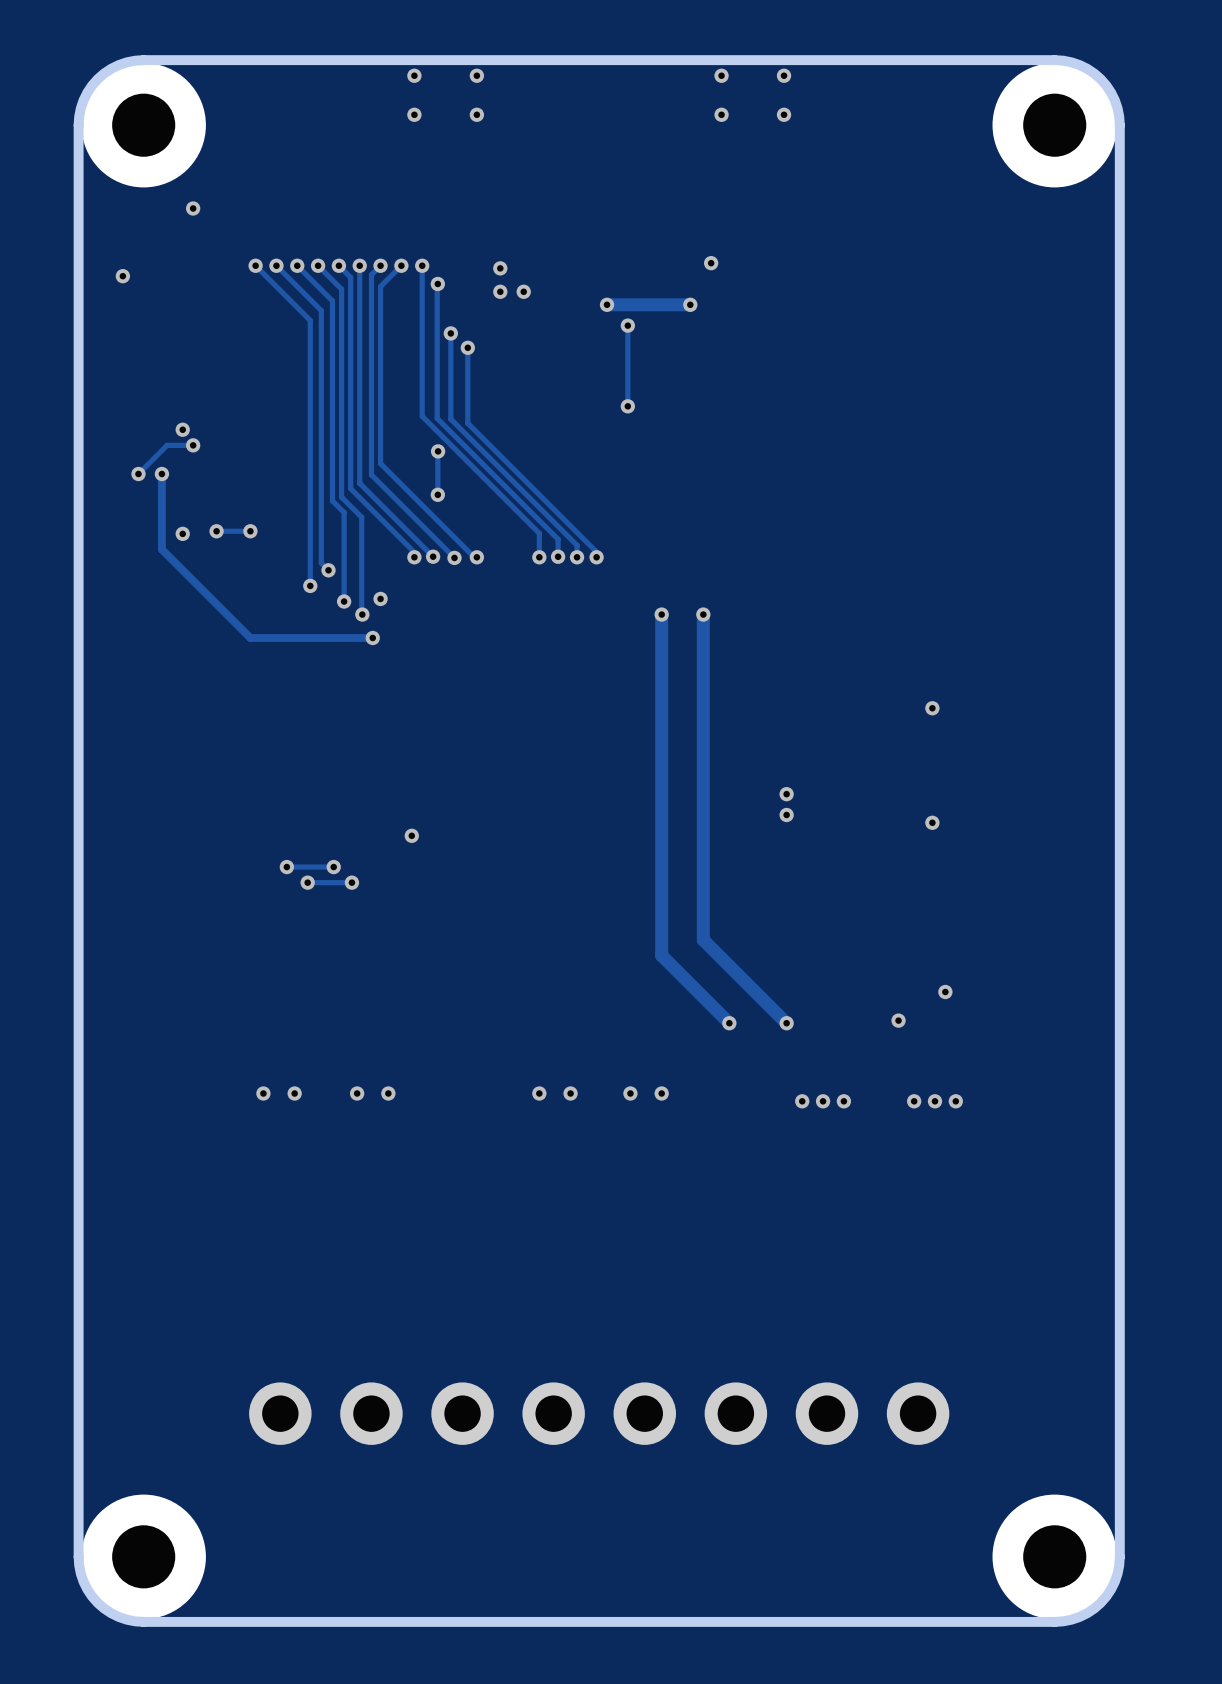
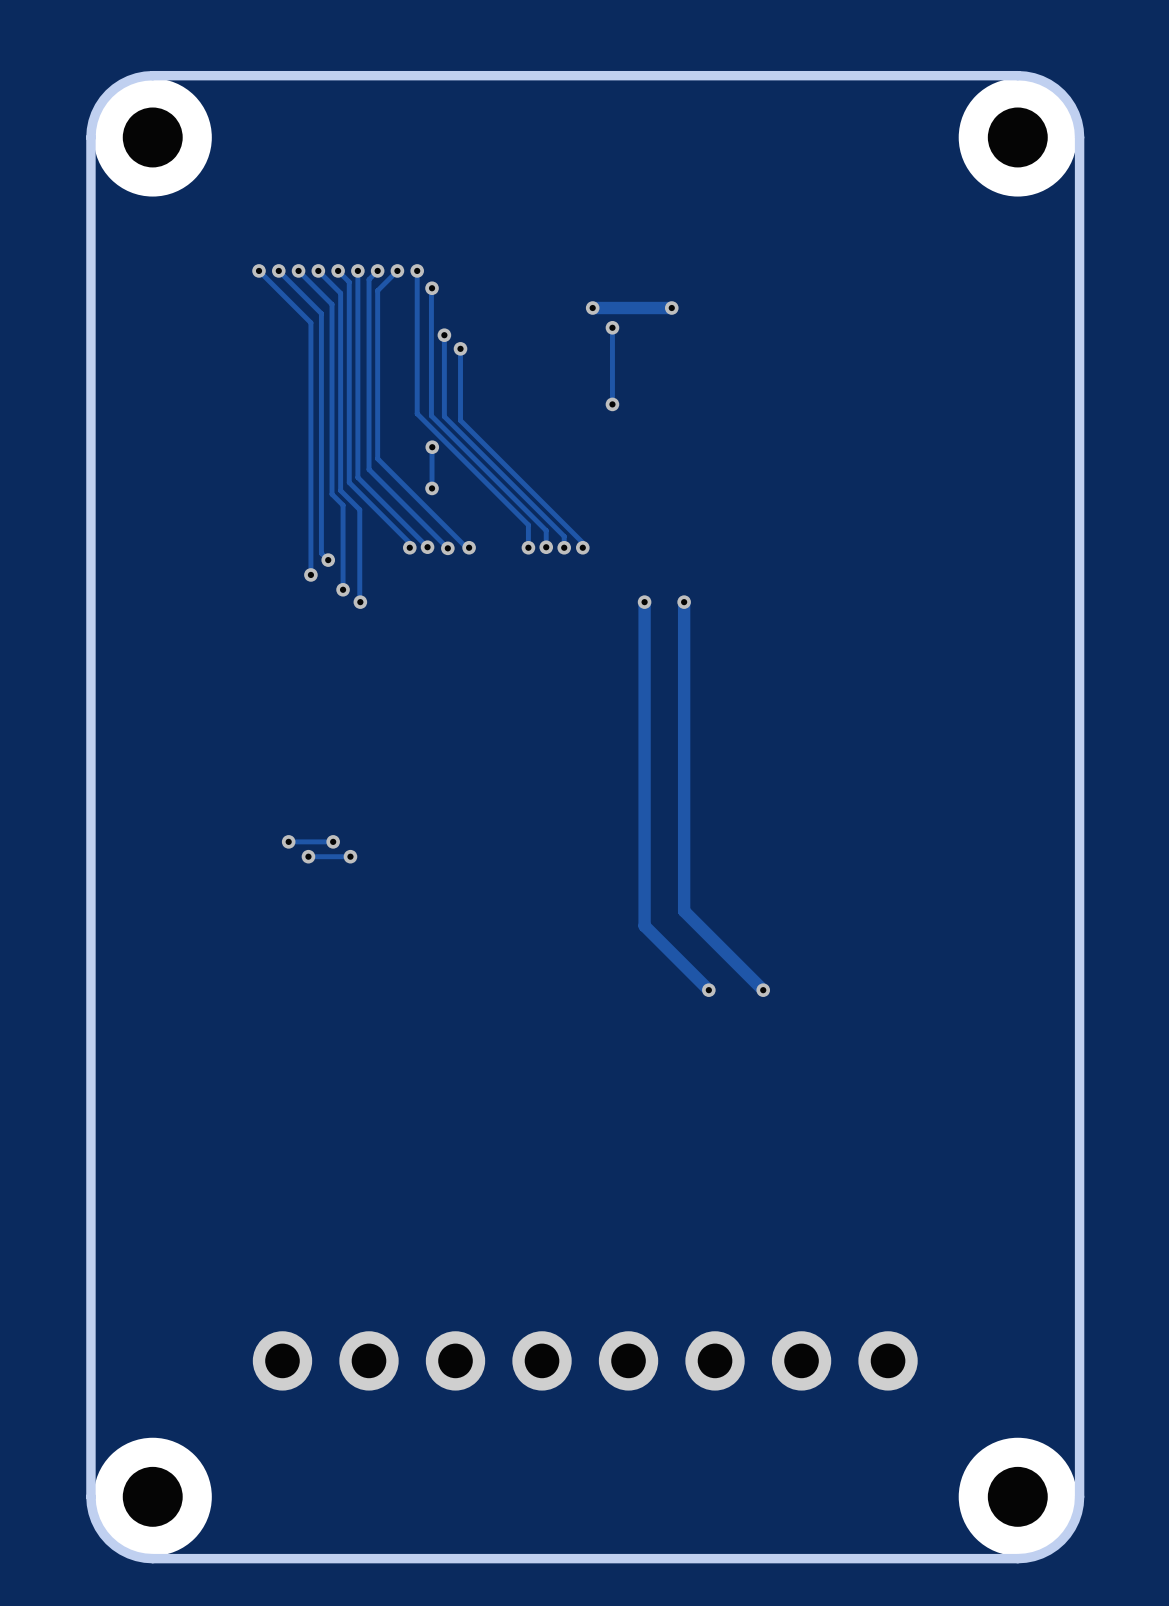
via: (414, 75) -> none
via: (476, 75) -> none
via: (721, 75) -> none
via: (784, 75) -> none
via: (414, 114) -> none
via: (476, 114) -> none
via: (721, 114) -> none
via: (784, 114) -> none
via: (193, 208) -> none
via: (711, 263) -> none
via: (500, 268) -> none
via: (122, 276) -> none
via: (500, 291) -> none
via: (523, 291) -> none
via: (182, 429) -> none
track: (193, 445) (167, 445) (138, 474) -> none
via: (193, 445) -> none
via: (138, 474) -> none
track: (161, 474) (161, 549) (250, 637) (372, 637) -> none
via: (161, 474) -> none
via: (216, 531) -> none
track: (250, 531) (216, 531) -> none
via: (250, 531) -> none
via: (182, 533) -> none
via: (380, 598) -> none
via: (372, 637) -> none
via: (932, 708) -> none
via: (786, 794) -> none
via: (786, 814) -> none
via: (932, 822) -> none
via: (411, 835) -> none
via: (945, 992) -> none
via: (898, 1020) -> none
via: (263, 1093) -> none
via: (294, 1093) -> none
via: (357, 1093) -> none
via: (388, 1093) -> none
via: (539, 1093) -> none
via: (570, 1093) -> none
via: (630, 1093) -> none
via: (661, 1093) -> none
via: (802, 1101) -> none
via: (823, 1101) -> none
via: (843, 1101) -> none
via: (914, 1101) -> none
via: (934, 1101) -> none
via: (955, 1101) -> none

